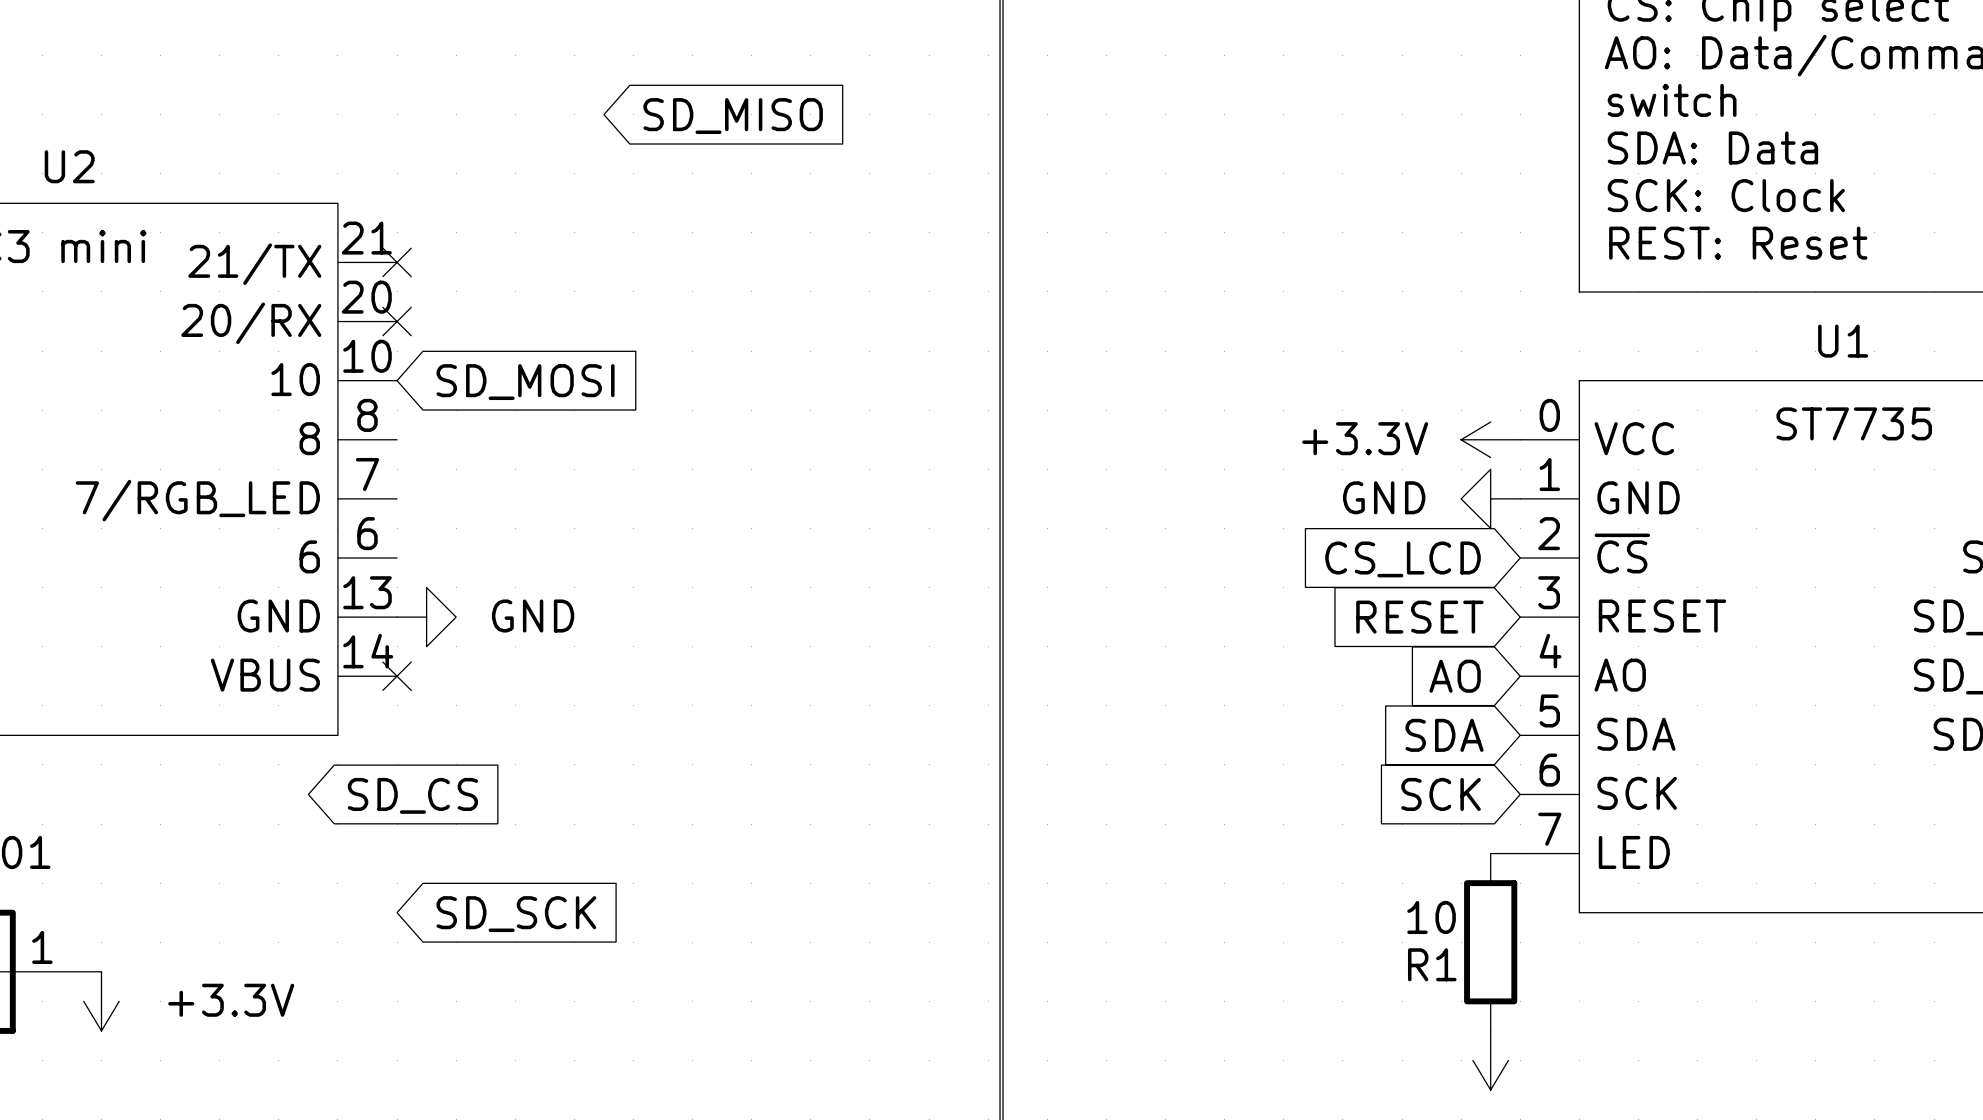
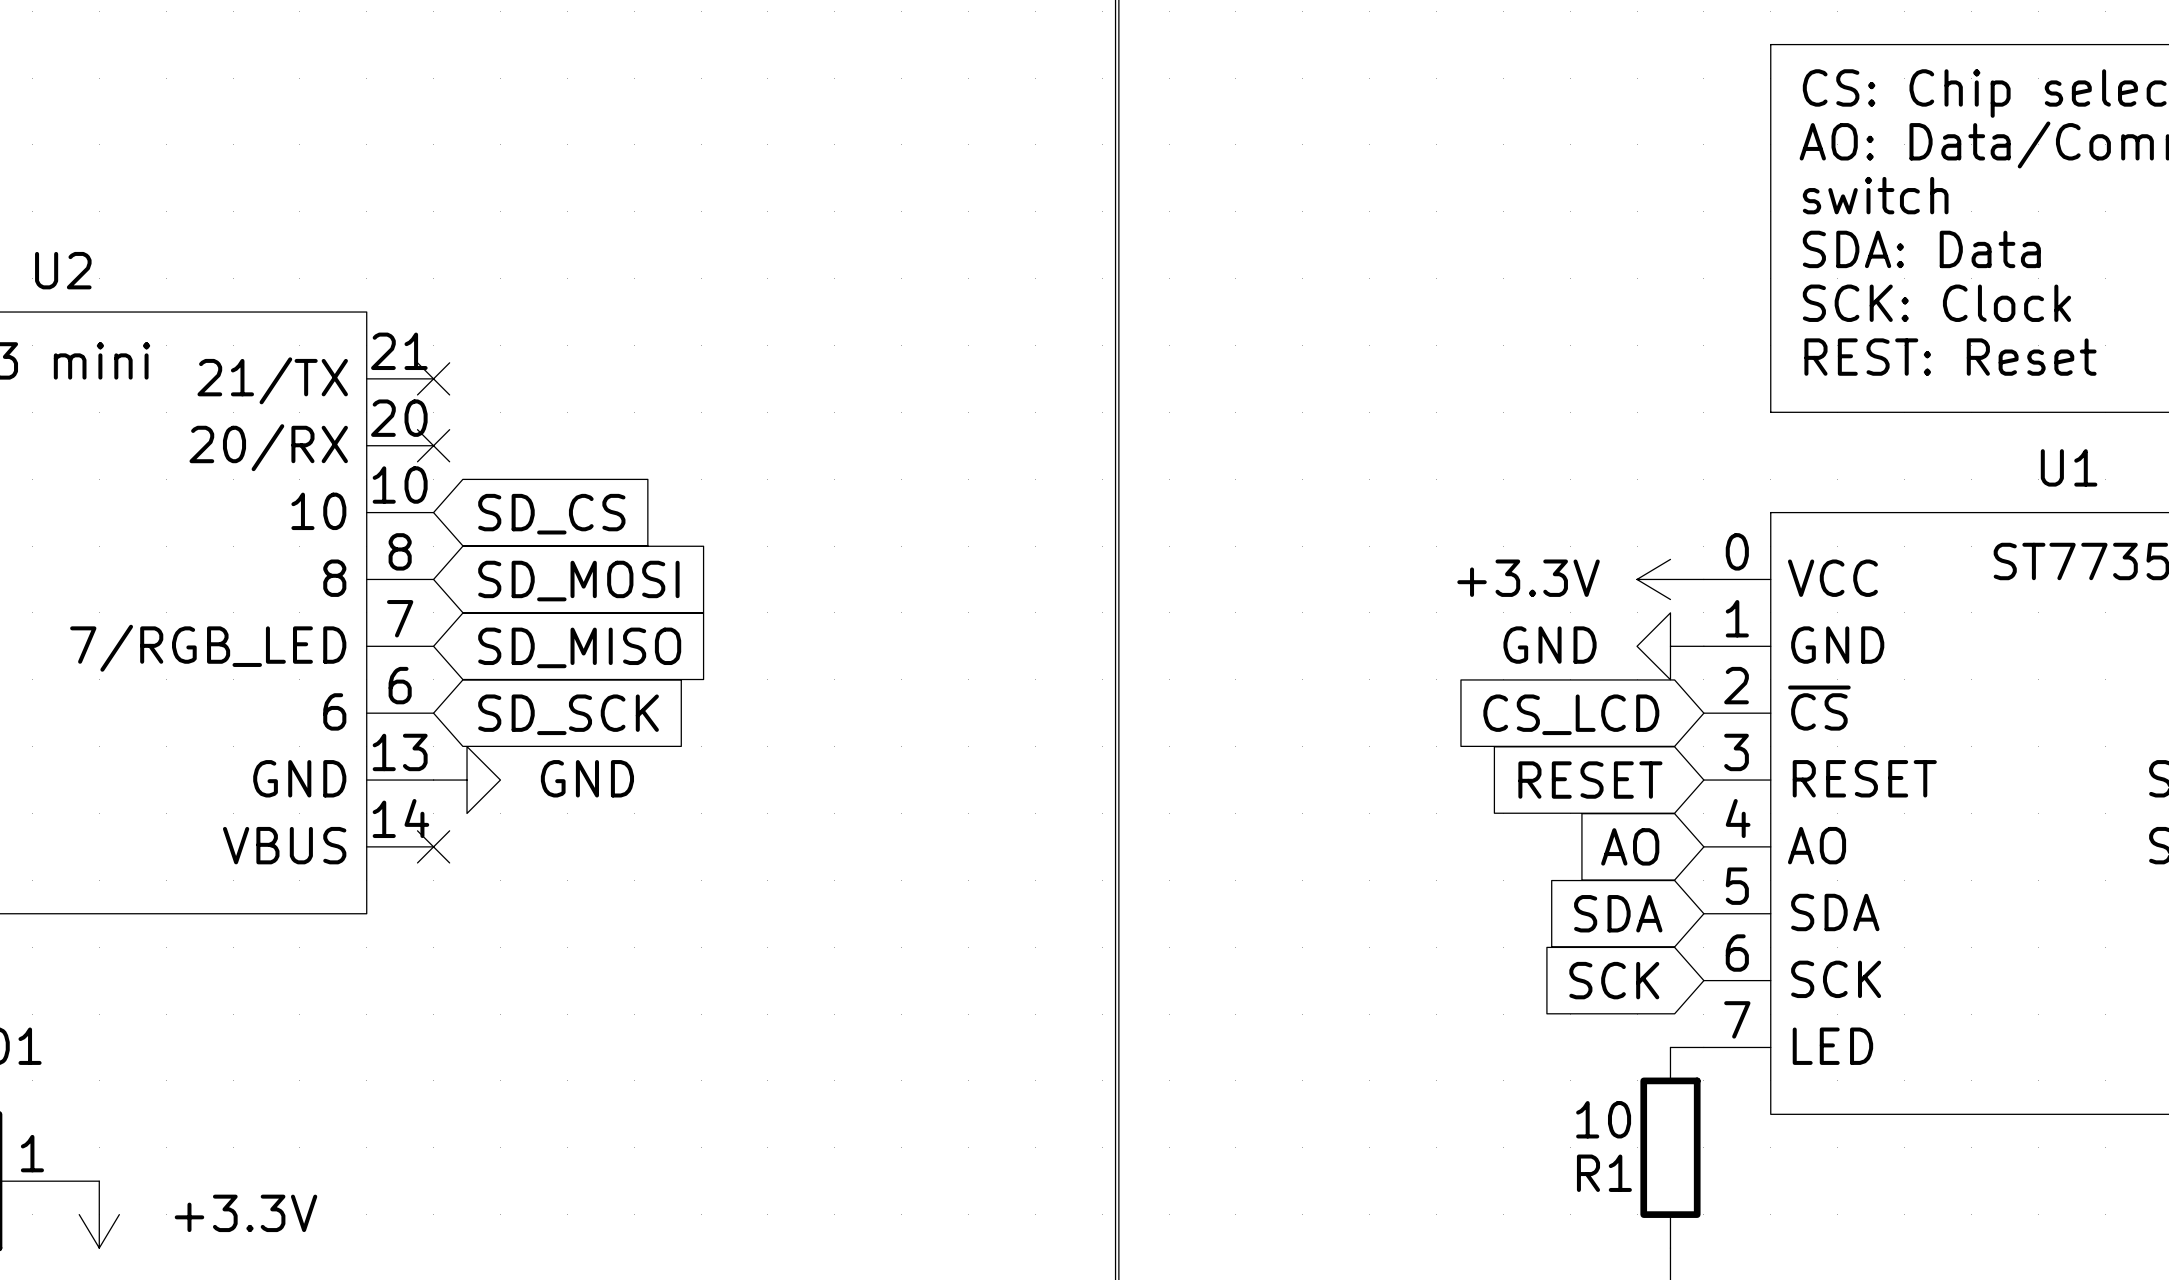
global label position: SD_MISO (733, 116) -> SD_MISO (579, 647)
global label: SD_MOSI (525, 382) -> SD_CS (551, 514)
global label: none -> SD_MOSI (578, 581)
global label: SD_CS (412, 795) -> none
global label position: SD_SCK (516, 914) -> SD_SCK (568, 714)

